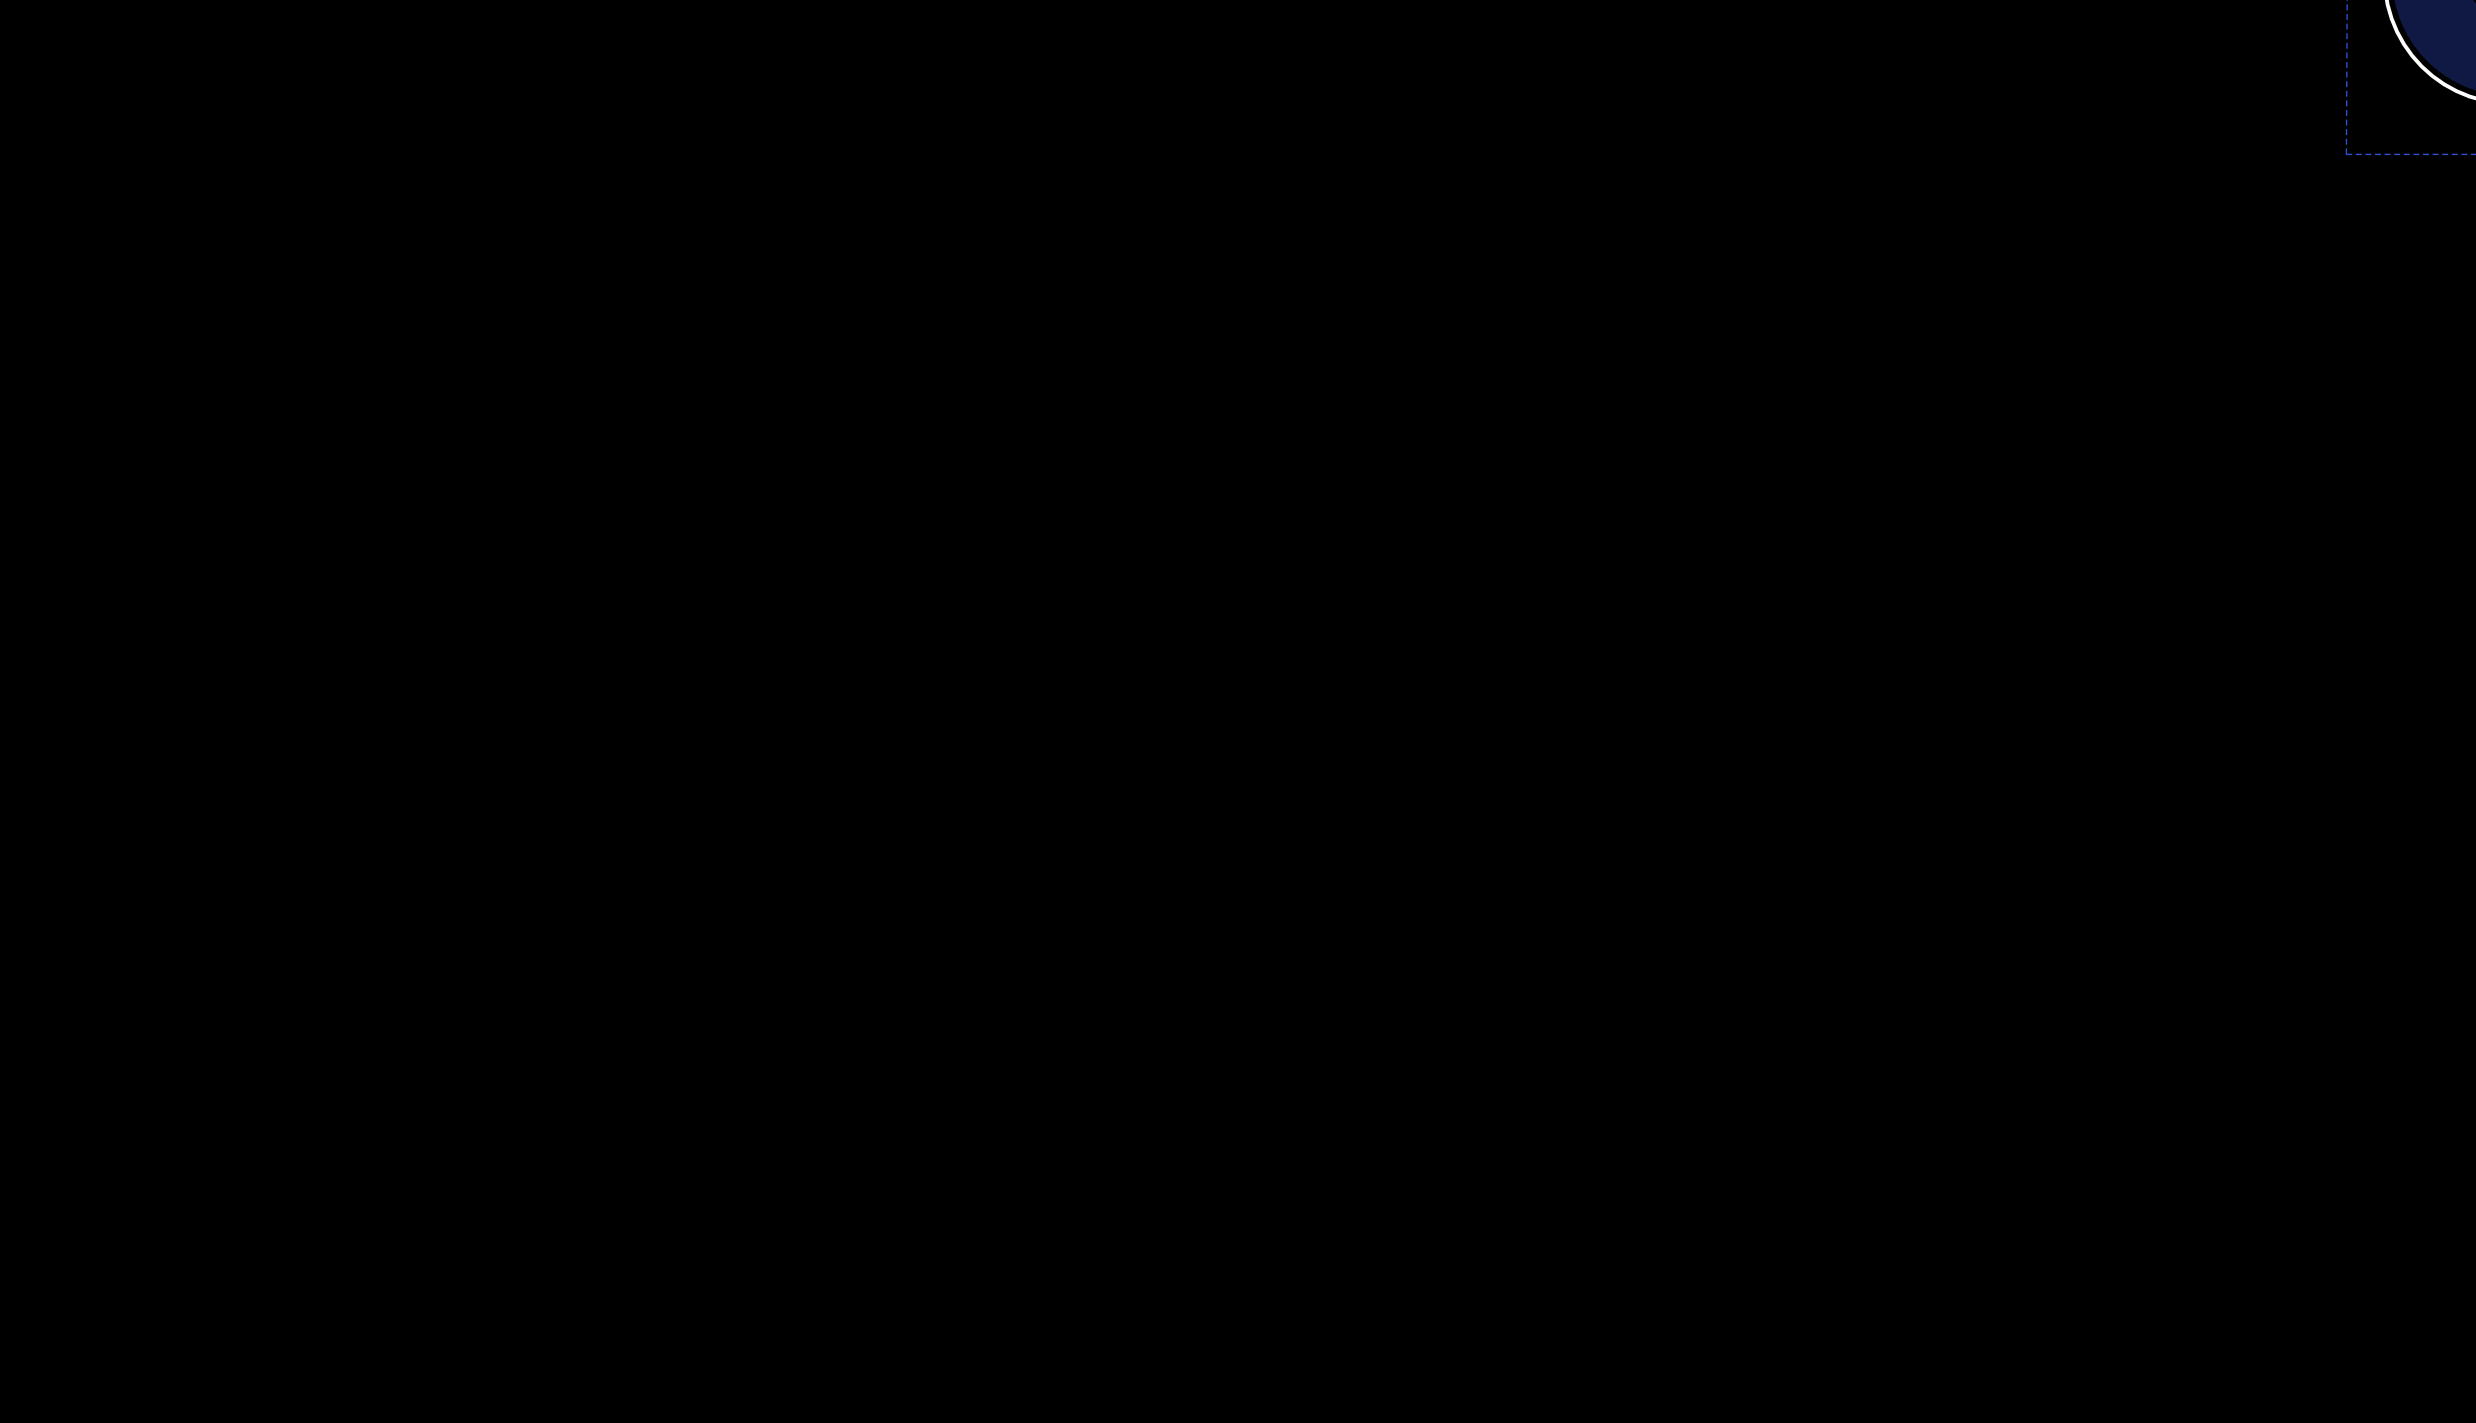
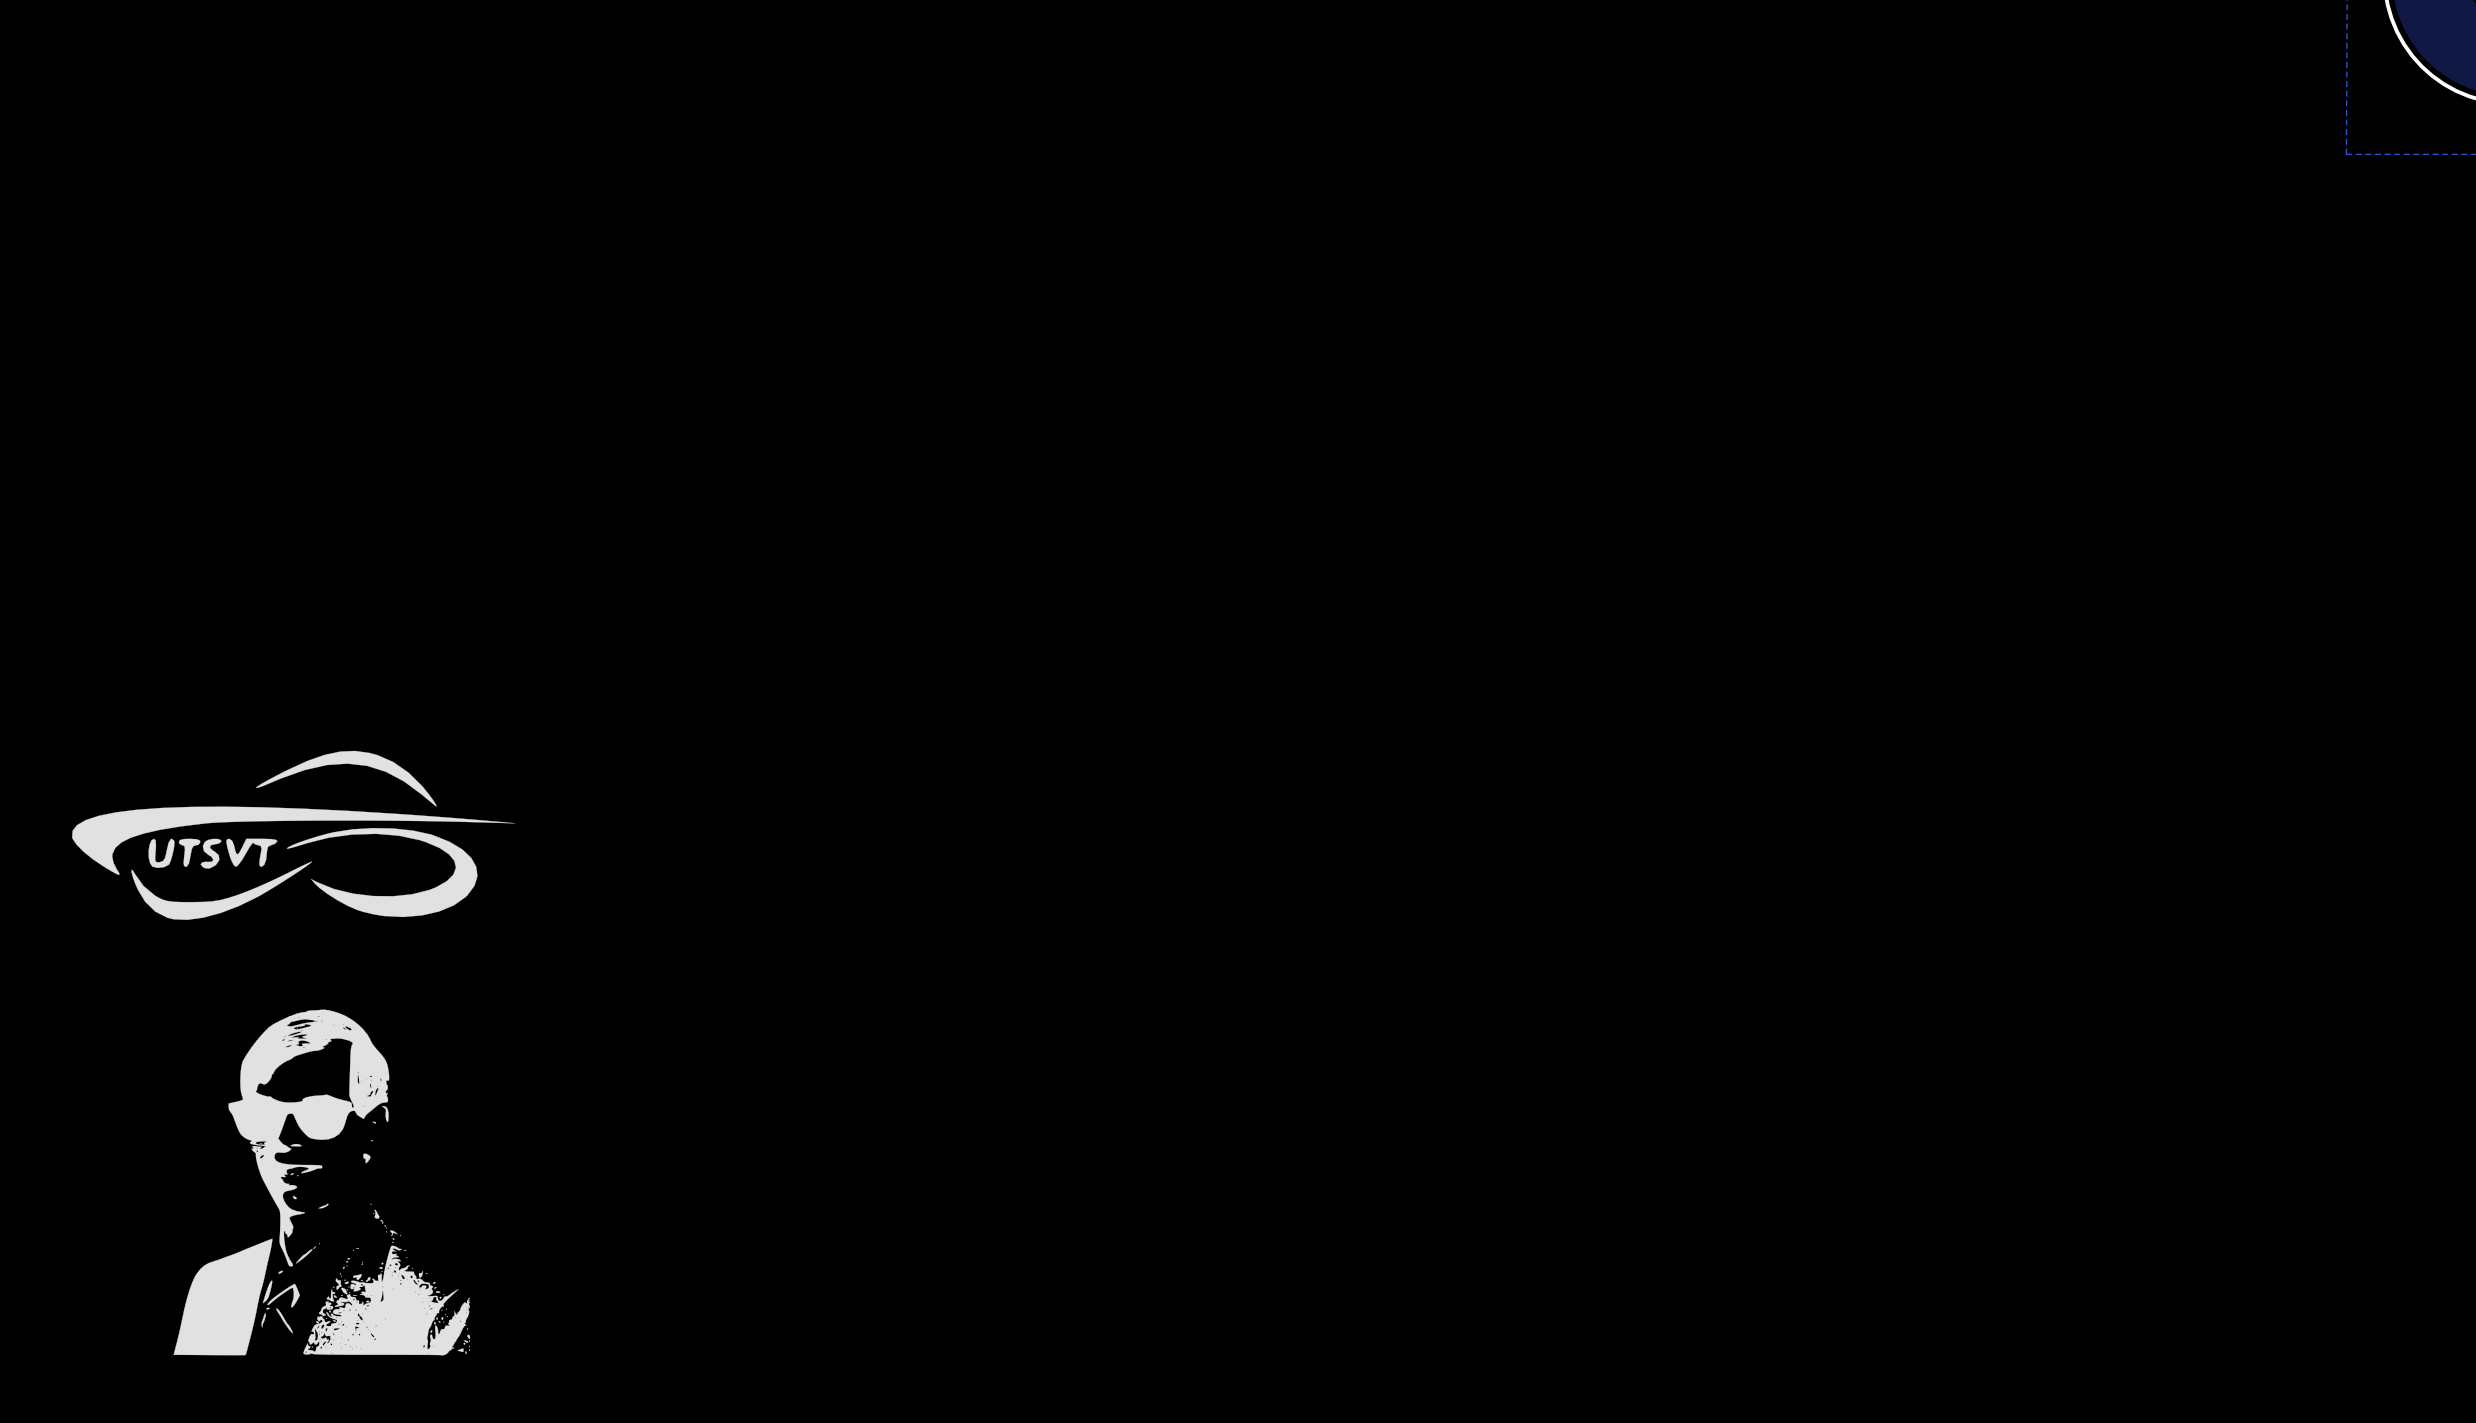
drawing: none -> [72, 750, 516, 920]
drawing: none -> [173, 1009, 471, 1356]

